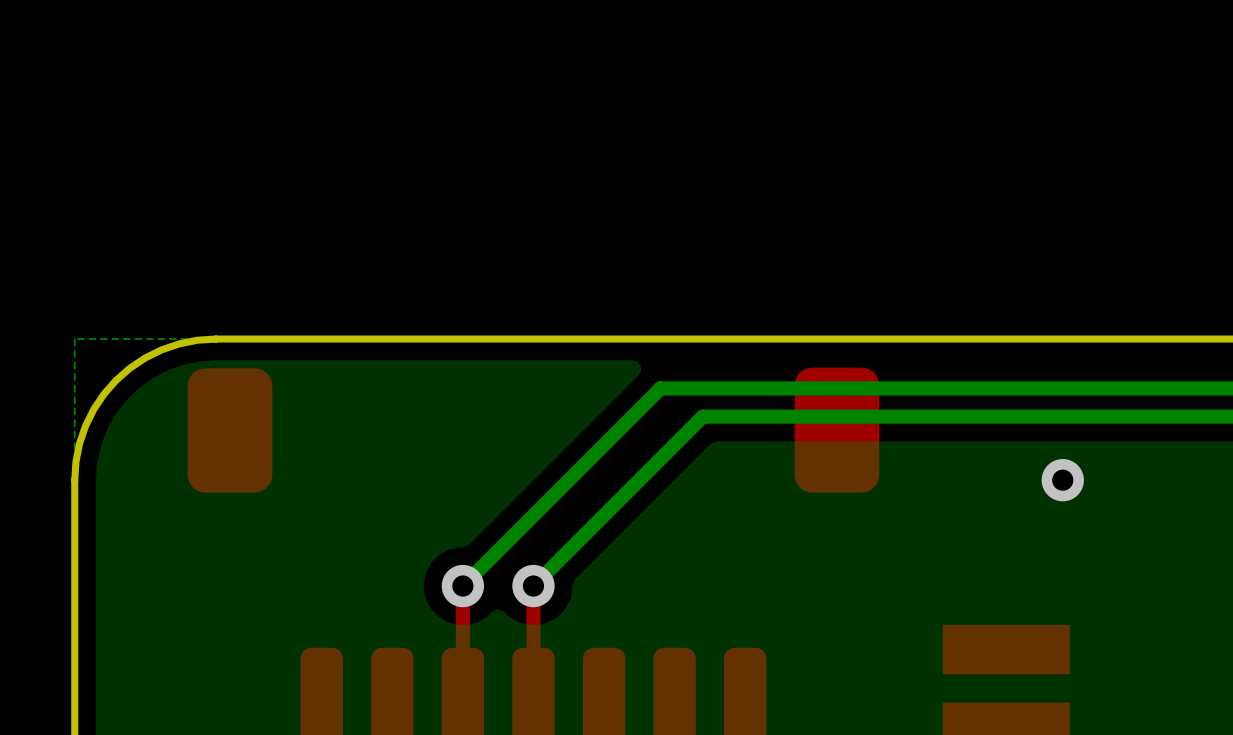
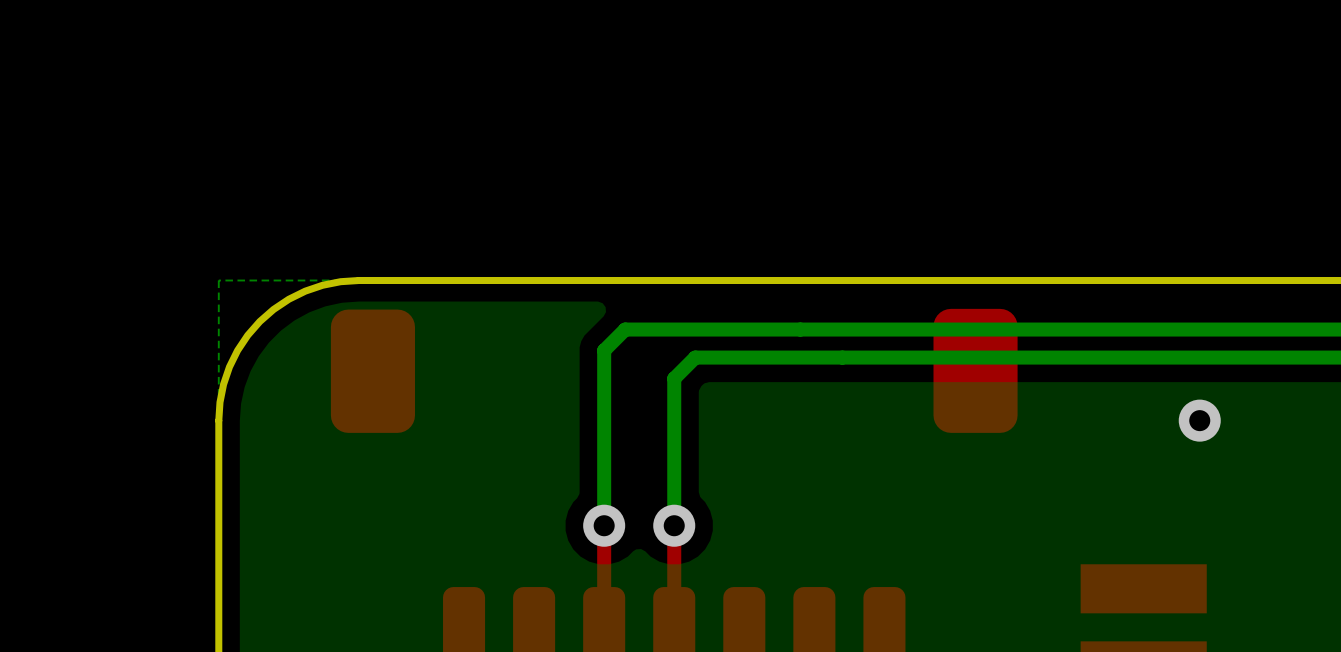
bottom track: (660, 388) (462, 586) -> (800, 329) (625, 329) (604, 350) (604, 525)
bottom track: (702, 416) (533, 586) -> (842, 357) (695, 357) (674, 378) (674, 525)

